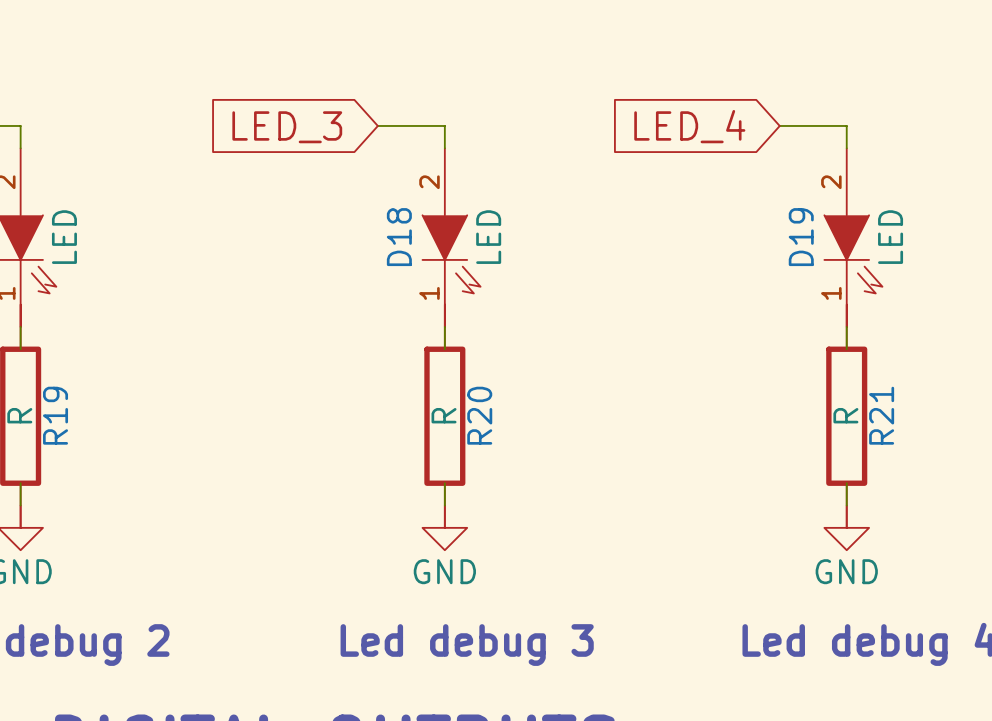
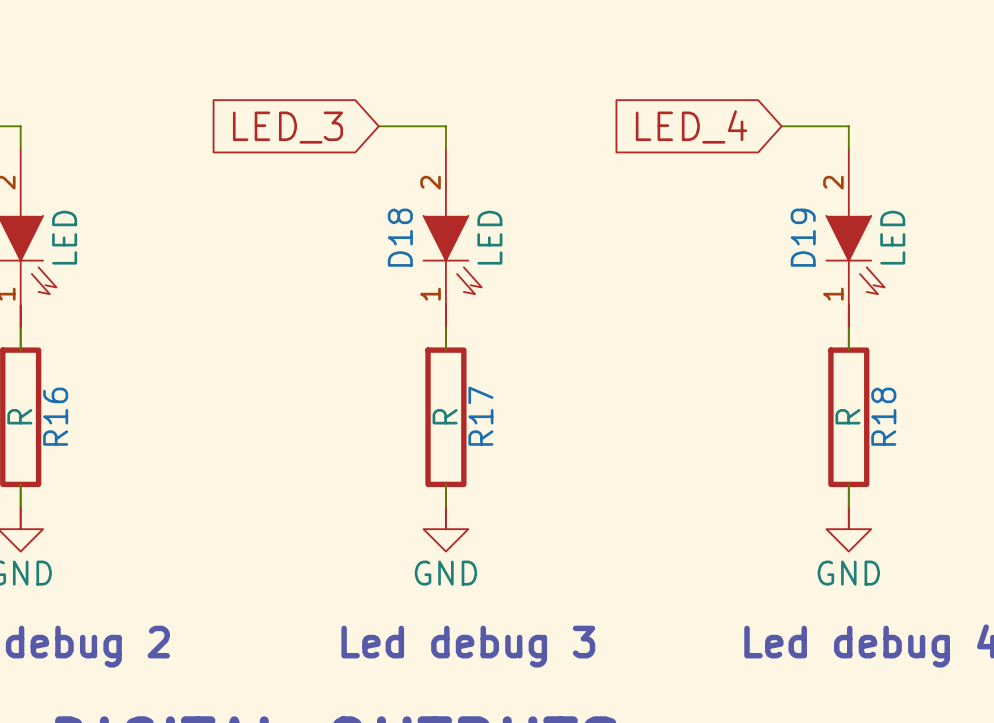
R19 name: R19 (55, 415) -> R16 (55, 416)
R20 name: R20 (479, 415) -> R17 (480, 416)
R21 name: R21 (881, 415) -> R18 (883, 416)

